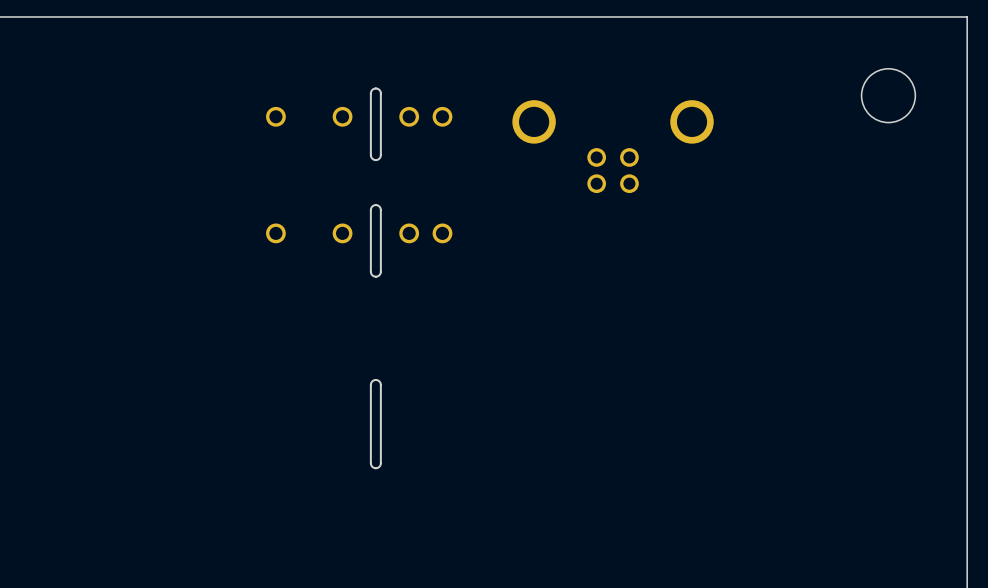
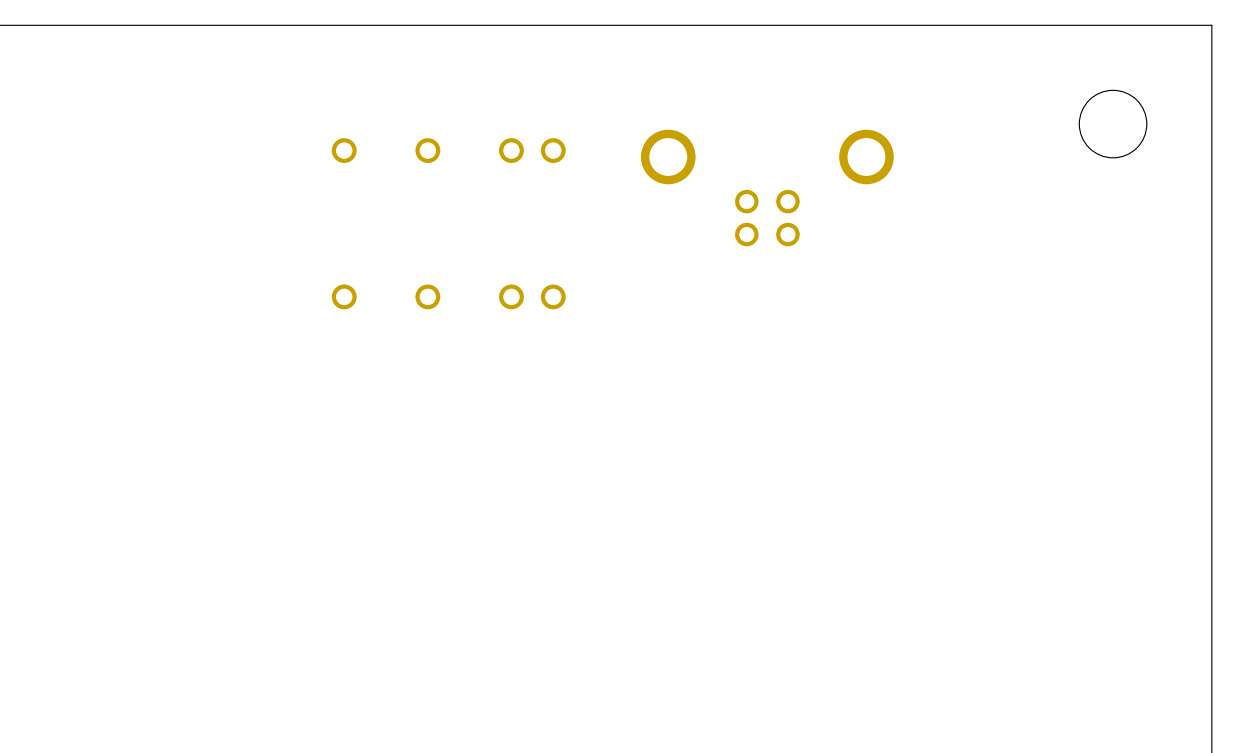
board edge: (375, 88) (380, 93) (380, 155) (375, 160) (370, 155) (370, 92) (375, 88) -> none
board edge: (375, 205) (380, 210) (380, 272) (375, 276) (370, 271) (370, 209) (375, 205) -> none
board edge: (375, 379) (380, 384) (380, 463) (375, 468) (370, 463) (370, 384) (375, 379) -> none

